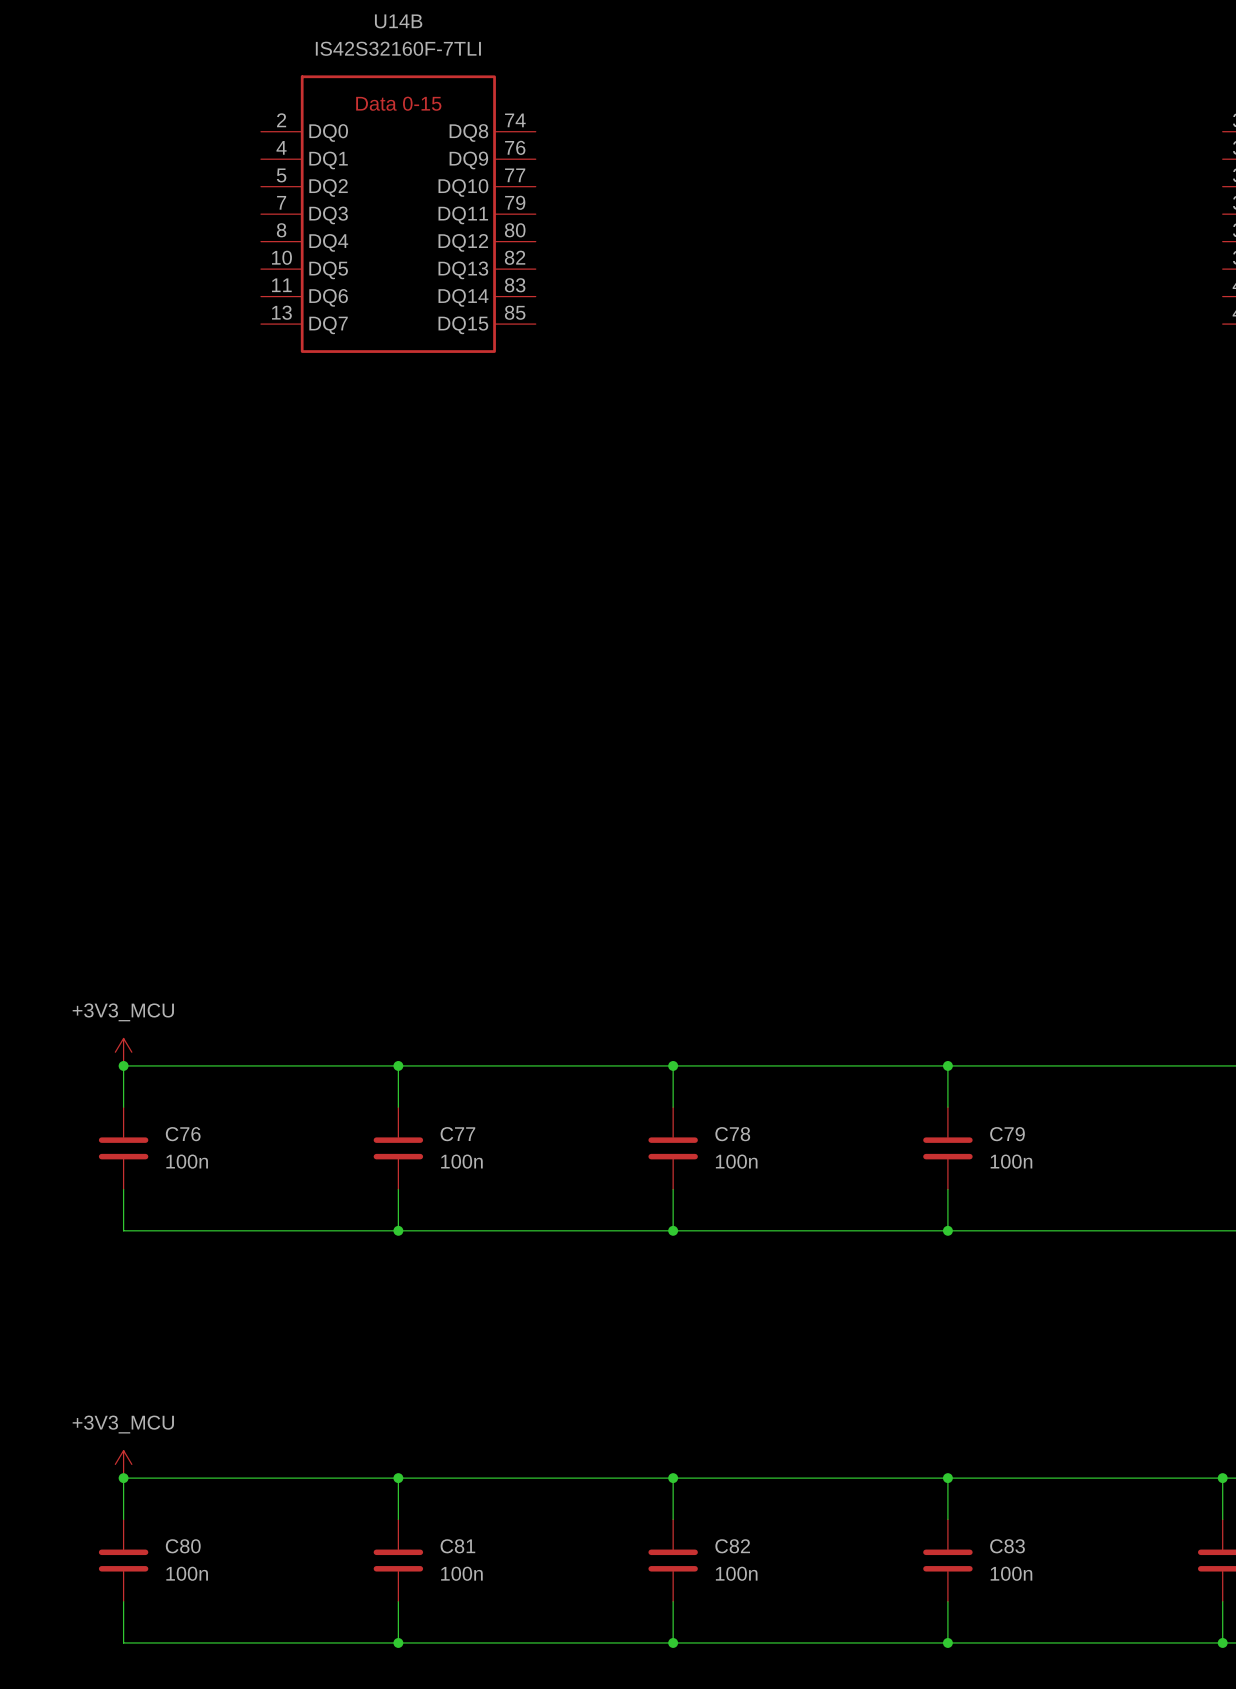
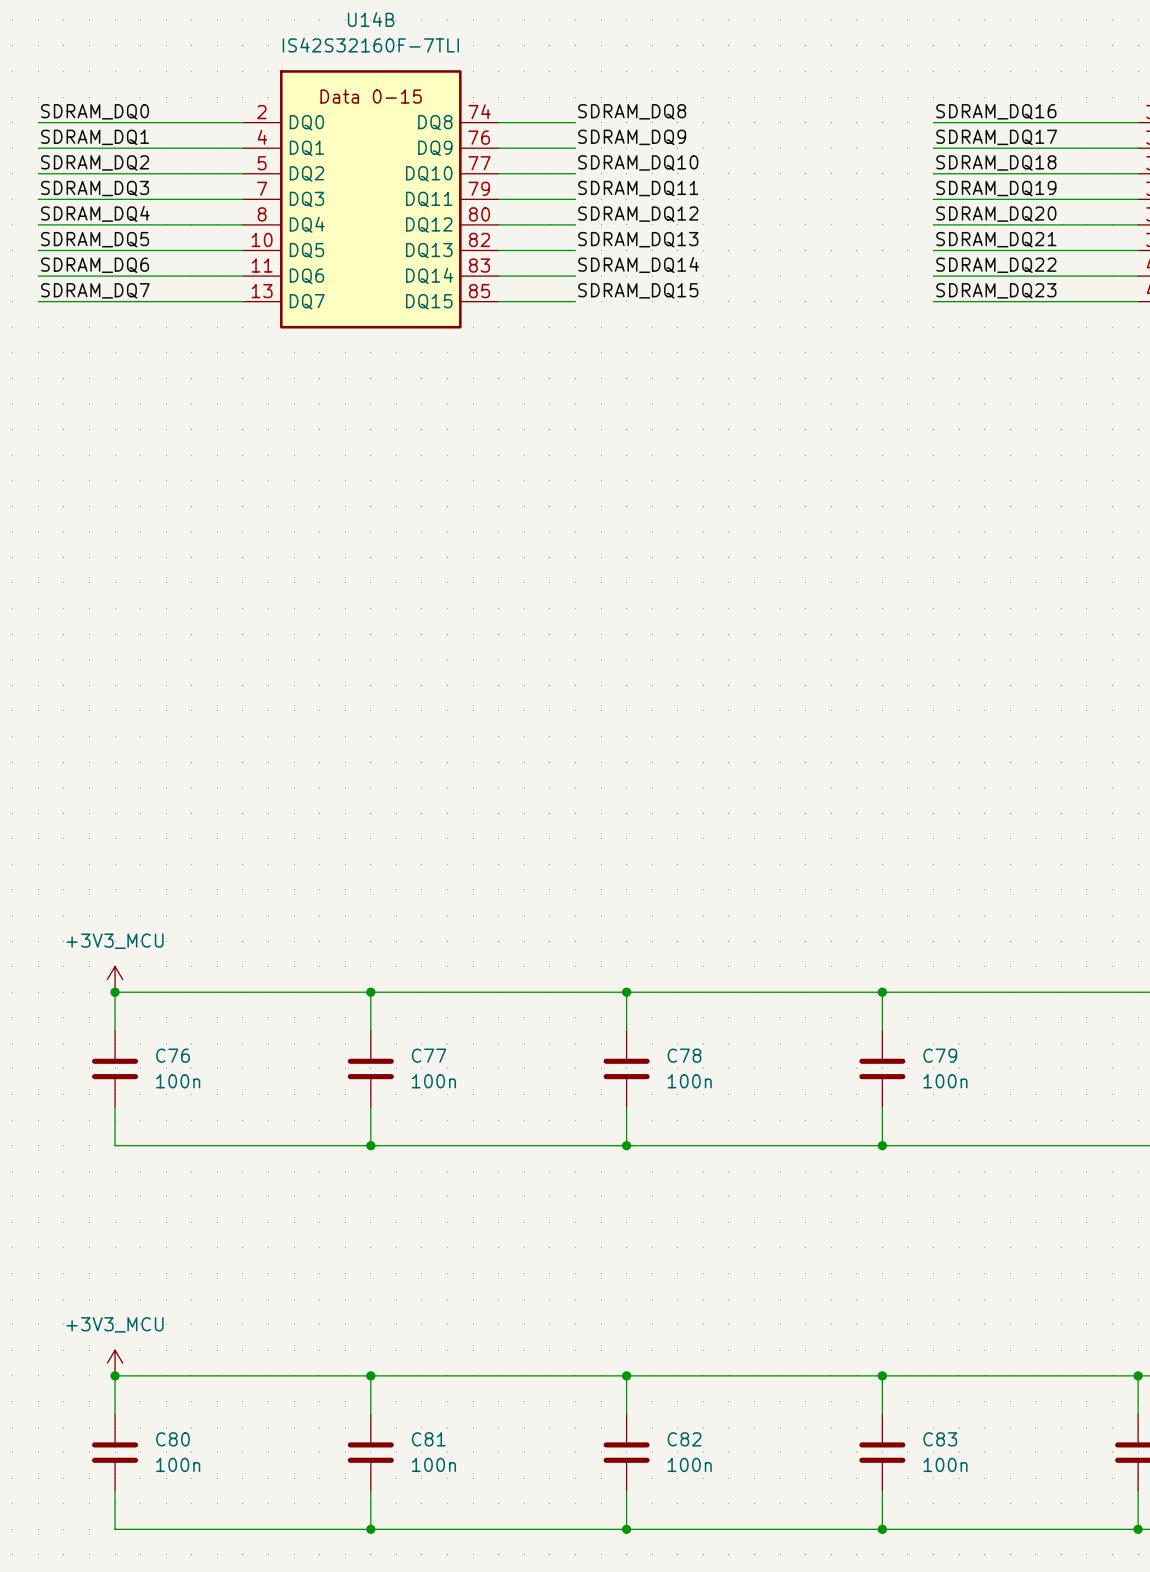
label: none -> SDRAM_DQ0 (95, 111)
label: none -> SDRAM_DQ8 (632, 111)
label: none -> SDRAM_DQ16 (996, 111)
wire: none -> (38, 122) (242, 122)
wire: none -> (498, 122) (575, 122)
wire: none -> (933, 122) (1138, 122)
label: none -> SDRAM_DQ1 (95, 137)
label: none -> SDRAM_DQ9 (632, 137)
label: none -> SDRAM_DQ17 (996, 137)
wire: none -> (38, 148) (242, 148)
wire: none -> (498, 148) (575, 148)
wire: none -> (933, 148) (1138, 148)
label: none -> SDRAM_DQ2 (95, 162)
label: none -> SDRAM_DQ10 (638, 162)
label: none -> SDRAM_DQ18 (996, 162)
wire: none -> (38, 173) (242, 173)
wire: none -> (498, 173) (575, 173)
wire: none -> (933, 173) (1138, 173)
label: none -> SDRAM_DQ3 (95, 188)
label: none -> SDRAM_DQ11 (638, 188)
label: none -> SDRAM_DQ19 (996, 188)
wire: none -> (38, 199) (242, 199)
wire: none -> (498, 199) (575, 199)
wire: none -> (933, 199) (1138, 199)
label: none -> SDRAM_DQ4 (95, 213)
label: none -> SDRAM_DQ12 (638, 214)
label: none -> SDRAM_DQ20 (996, 214)
wire: none -> (38, 224) (242, 224)
wire: none -> (498, 224) (575, 224)
wire: none -> (933, 224) (1138, 224)
label: none -> SDRAM_DQ5 (95, 239)
label: none -> SDRAM_DQ13 (638, 239)
label: none -> SDRAM_DQ21 (996, 239)
wire: none -> (38, 250) (242, 250)
wire: none -> (498, 250) (575, 250)
wire: none -> (933, 250) (1138, 250)
label: none -> SDRAM_DQ6 (95, 265)
label: none -> SDRAM_DQ14 (638, 264)
label: none -> SDRAM_DQ22 (996, 265)
wire: none -> (38, 276) (242, 276)
wire: none -> (498, 276) (575, 276)
wire: none -> (933, 276) (1138, 276)
label: none -> SDRAM_DQ7 (95, 290)
label: none -> SDRAM_DQ15 (638, 290)
label: none -> SDRAM_DQ23 (996, 290)
wire: none -> (38, 301) (242, 301)
wire: none -> (498, 301) (575, 301)
wire: none -> (933, 301) (1138, 301)

